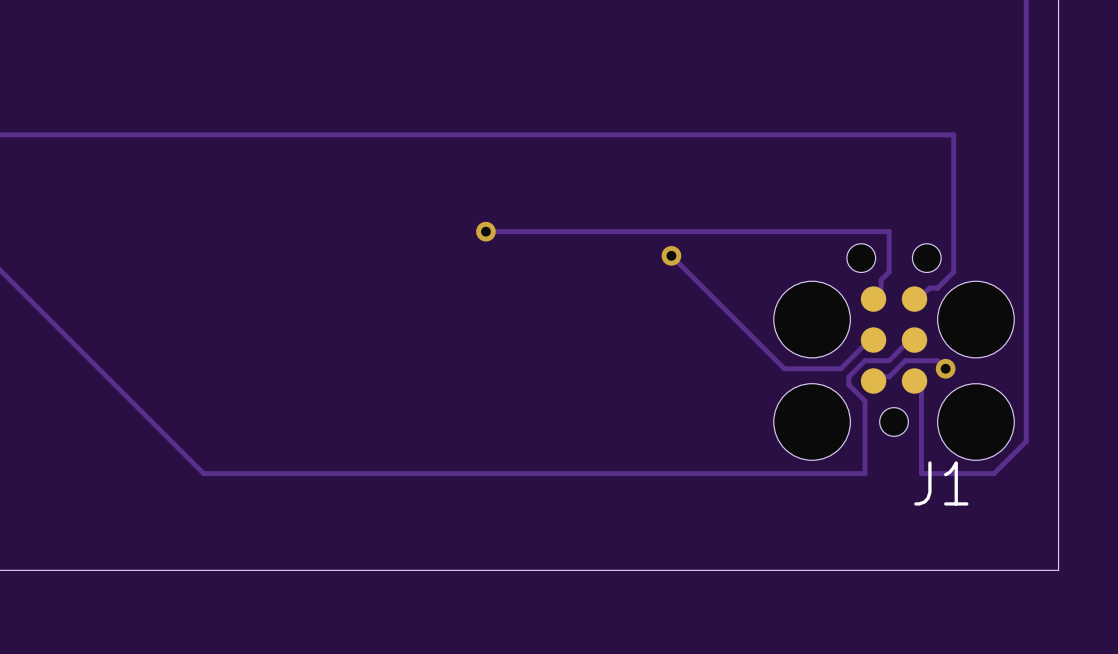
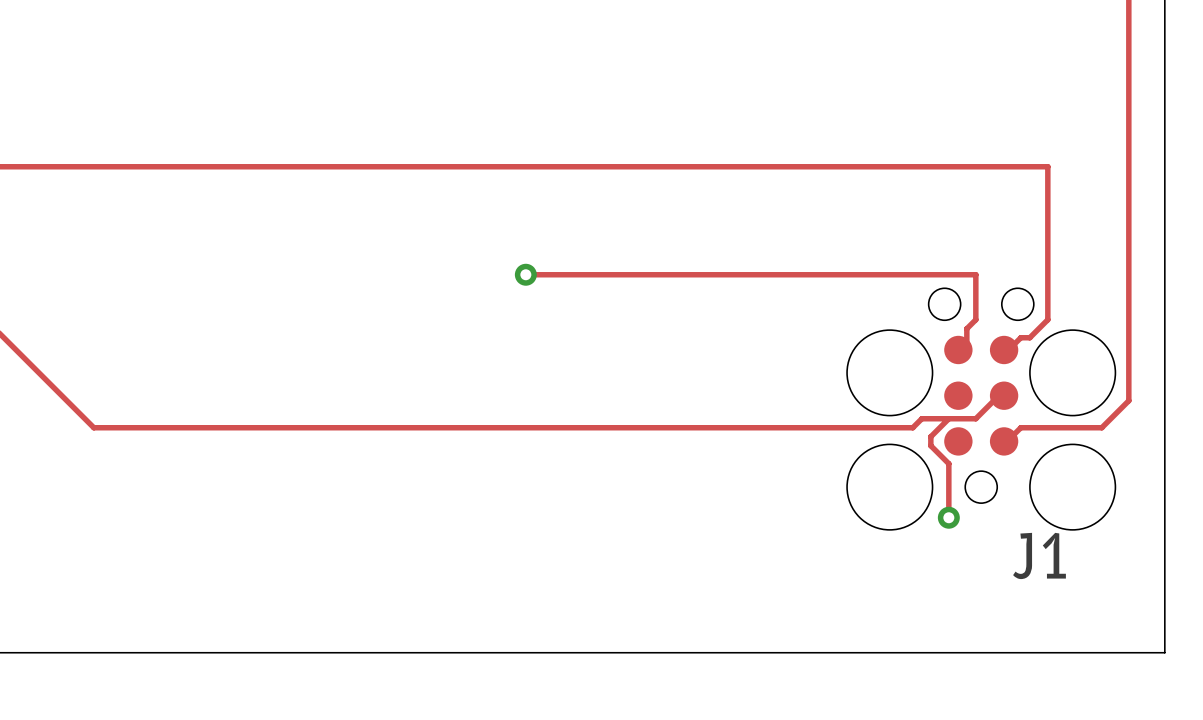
track: (671, 255) (784, 368) -> none
via: (671, 255) -> none
track: (873, 340) (873, 344) (864, 344) (840, 368) (832, 368) -> (948, 418) (921, 418) (912, 427)
track: (1026, 344) (1026, 441) (994, 473) (921, 473) (921, 384) (914, 381) -> (1128, 400) (1101, 427) (1020, 427) (1004, 441)
track: (98, 368) (203, 473) (864, 473) (864, 449) -> (93, 427) (858, 427)
track: (945, 368) (937, 360) (905, 360) (889, 376) (881, 376) (873, 381) -> none
via position: (945, 368) -> (948, 517)

